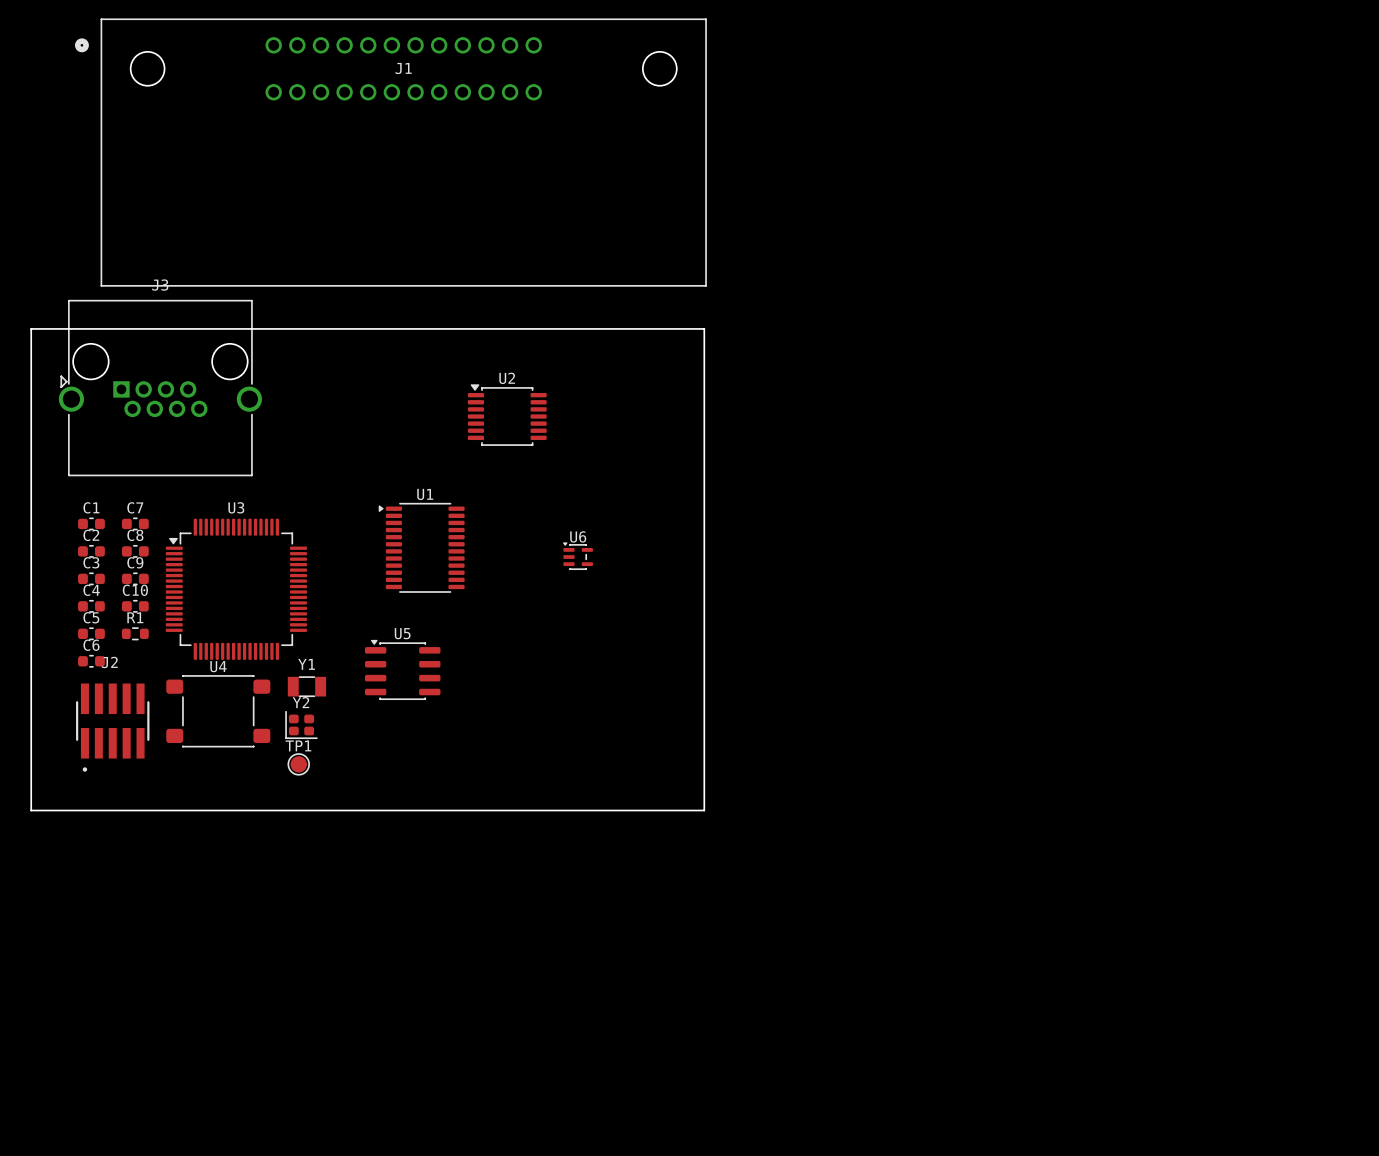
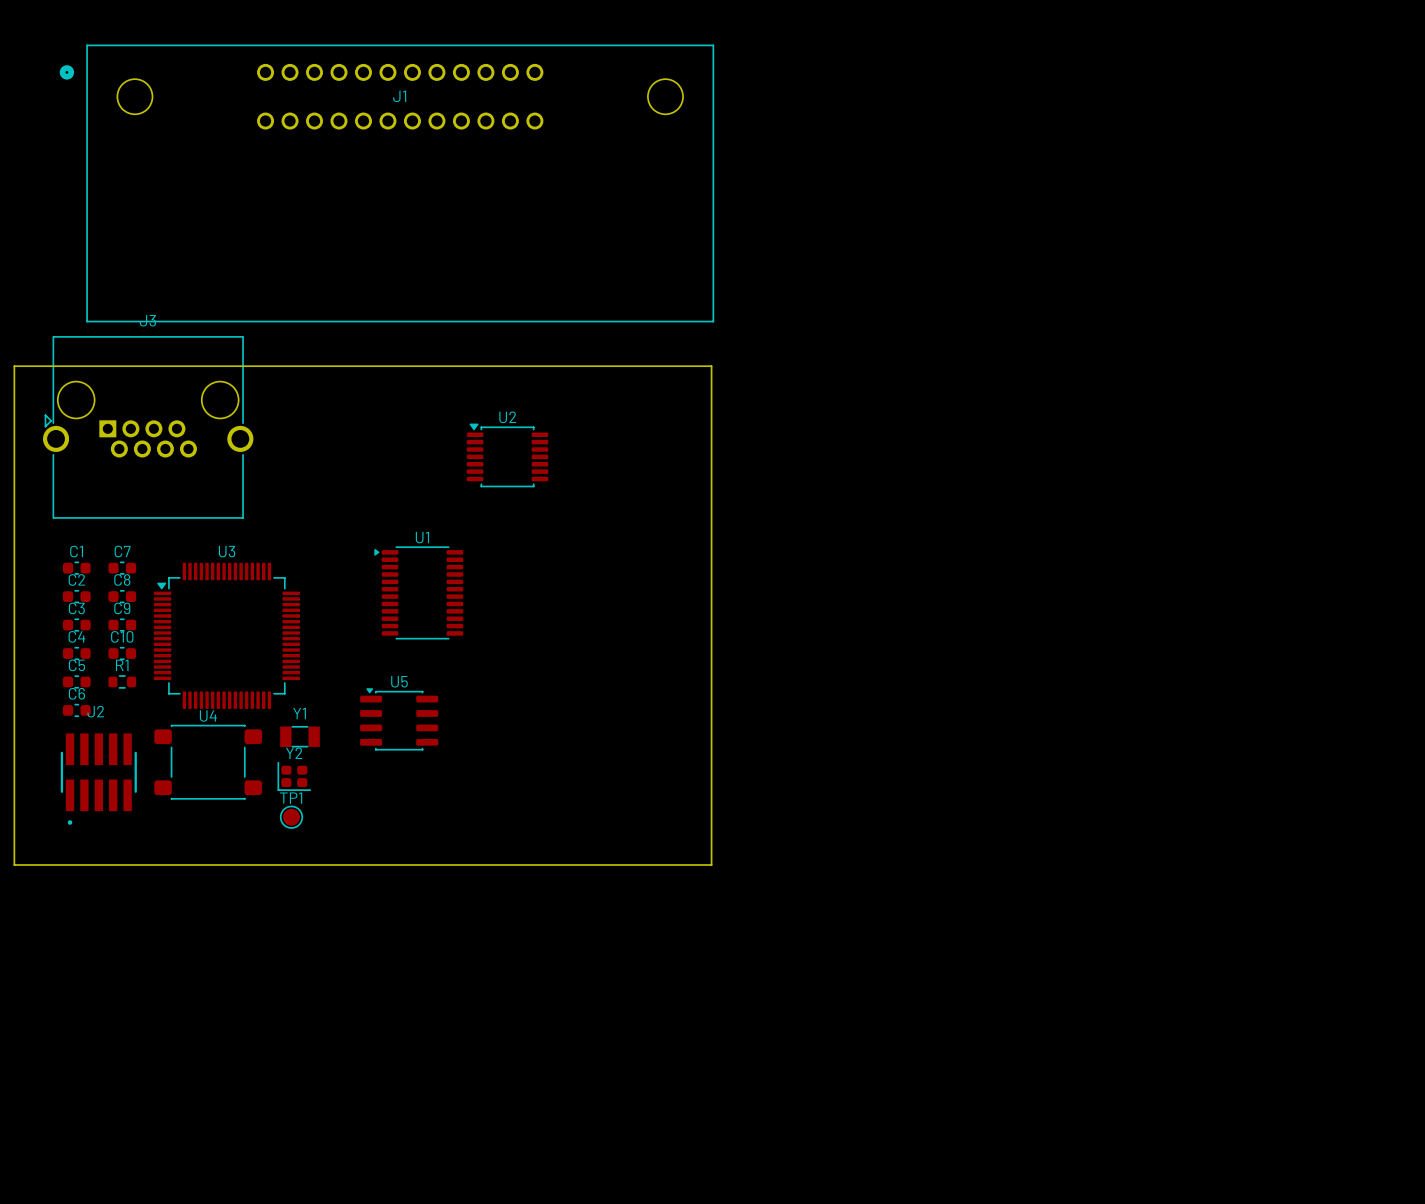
U6: (578, 556) -> none

